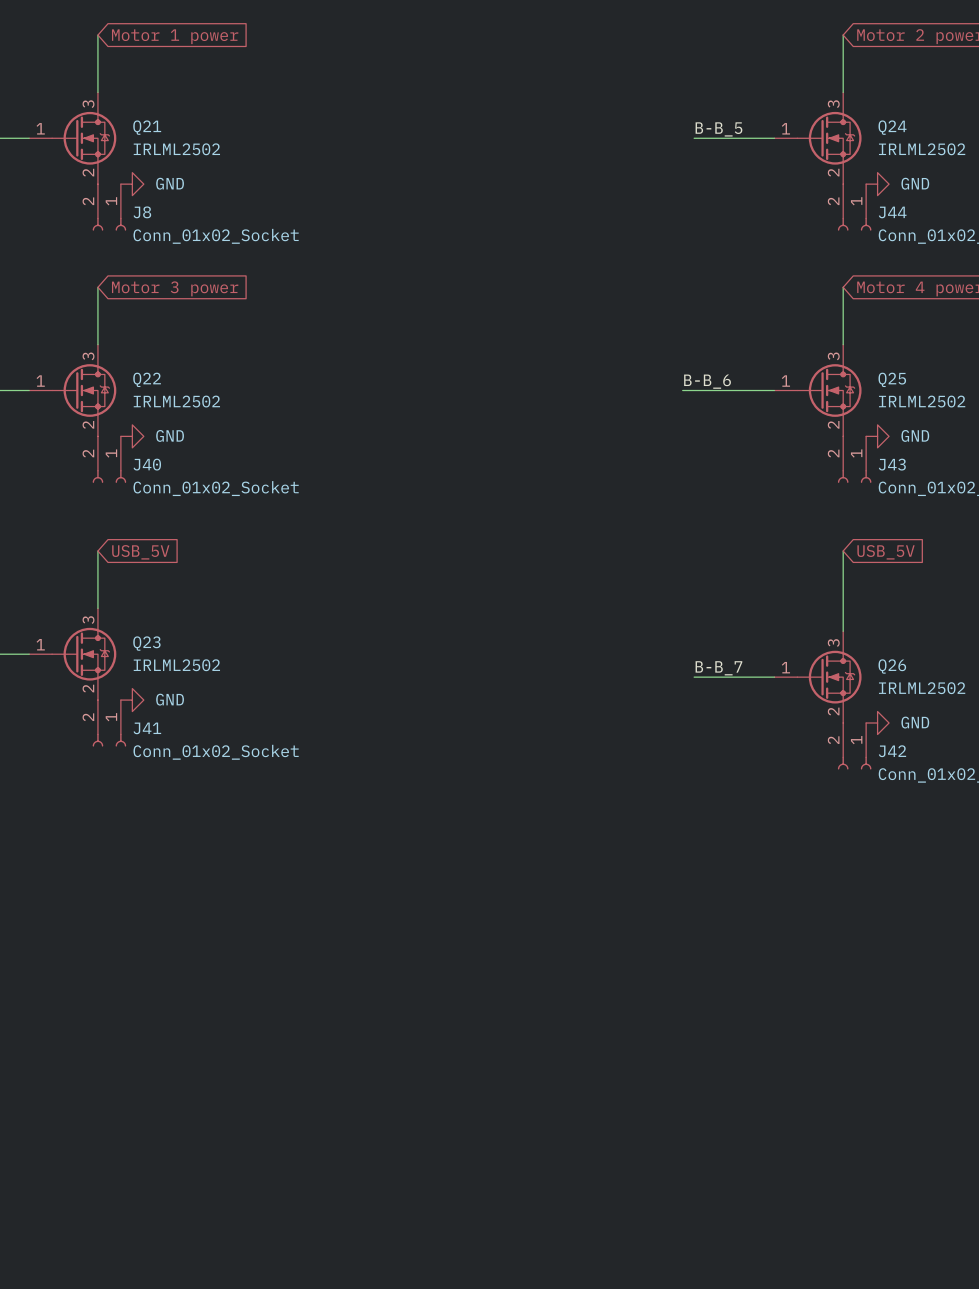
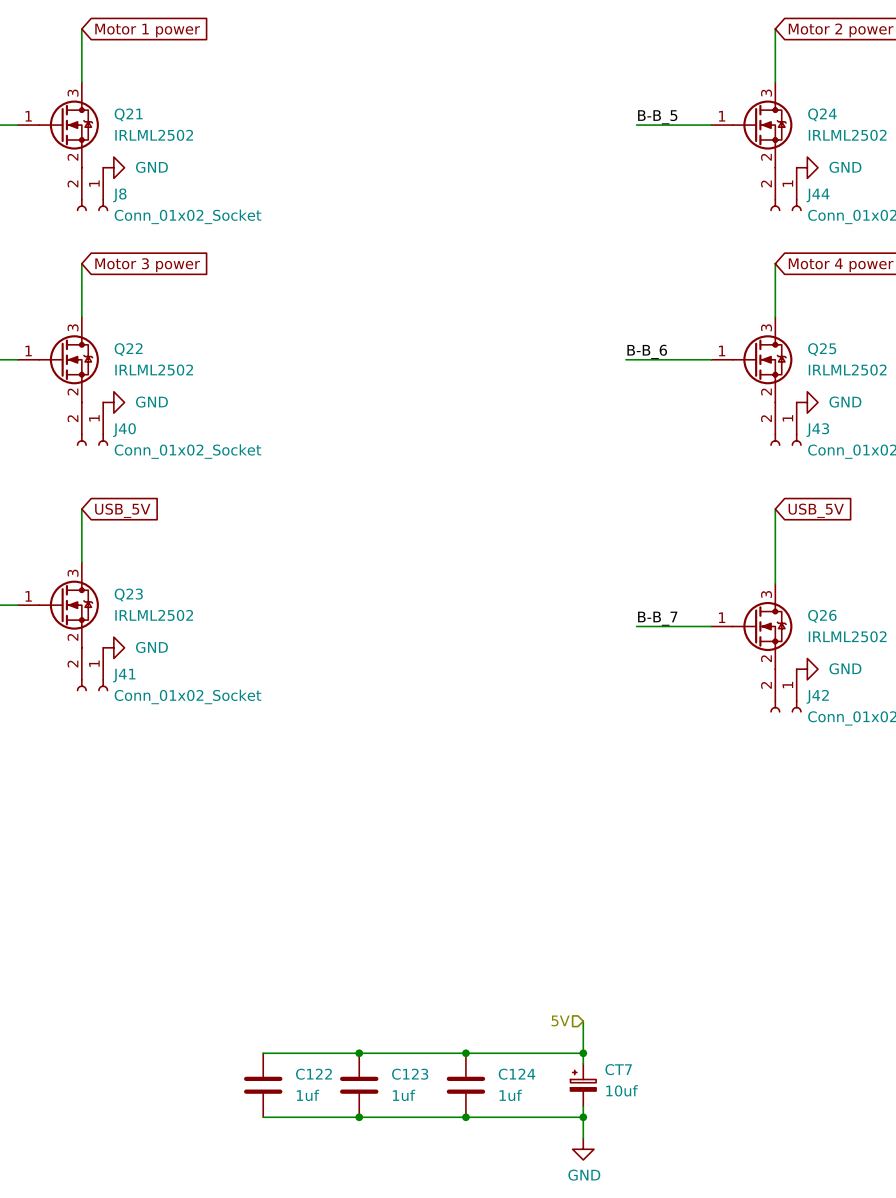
hierarchical label: none -> 5V (560, 1020)
wire: none -> (583, 1021) (583, 1063)
wire: none -> (263, 1053) (583, 1053)
junction: none -> (359, 1053)
junction: none -> (465, 1053)
junction: none -> (583, 1053)
C122: none -> 1uf (263, 1085)
C123: none -> 1uf (359, 1085)
C124: none -> 1uf (465, 1085)
CT7: none -> 10uf (583, 1085)
wire: none -> (583, 1106) (583, 1138)
wire: none -> (263, 1117) (583, 1117)
junction: none -> (359, 1117)
junction: none -> (465, 1117)
junction: none -> (583, 1117)
power symbol: none -> GND (583, 1149)

